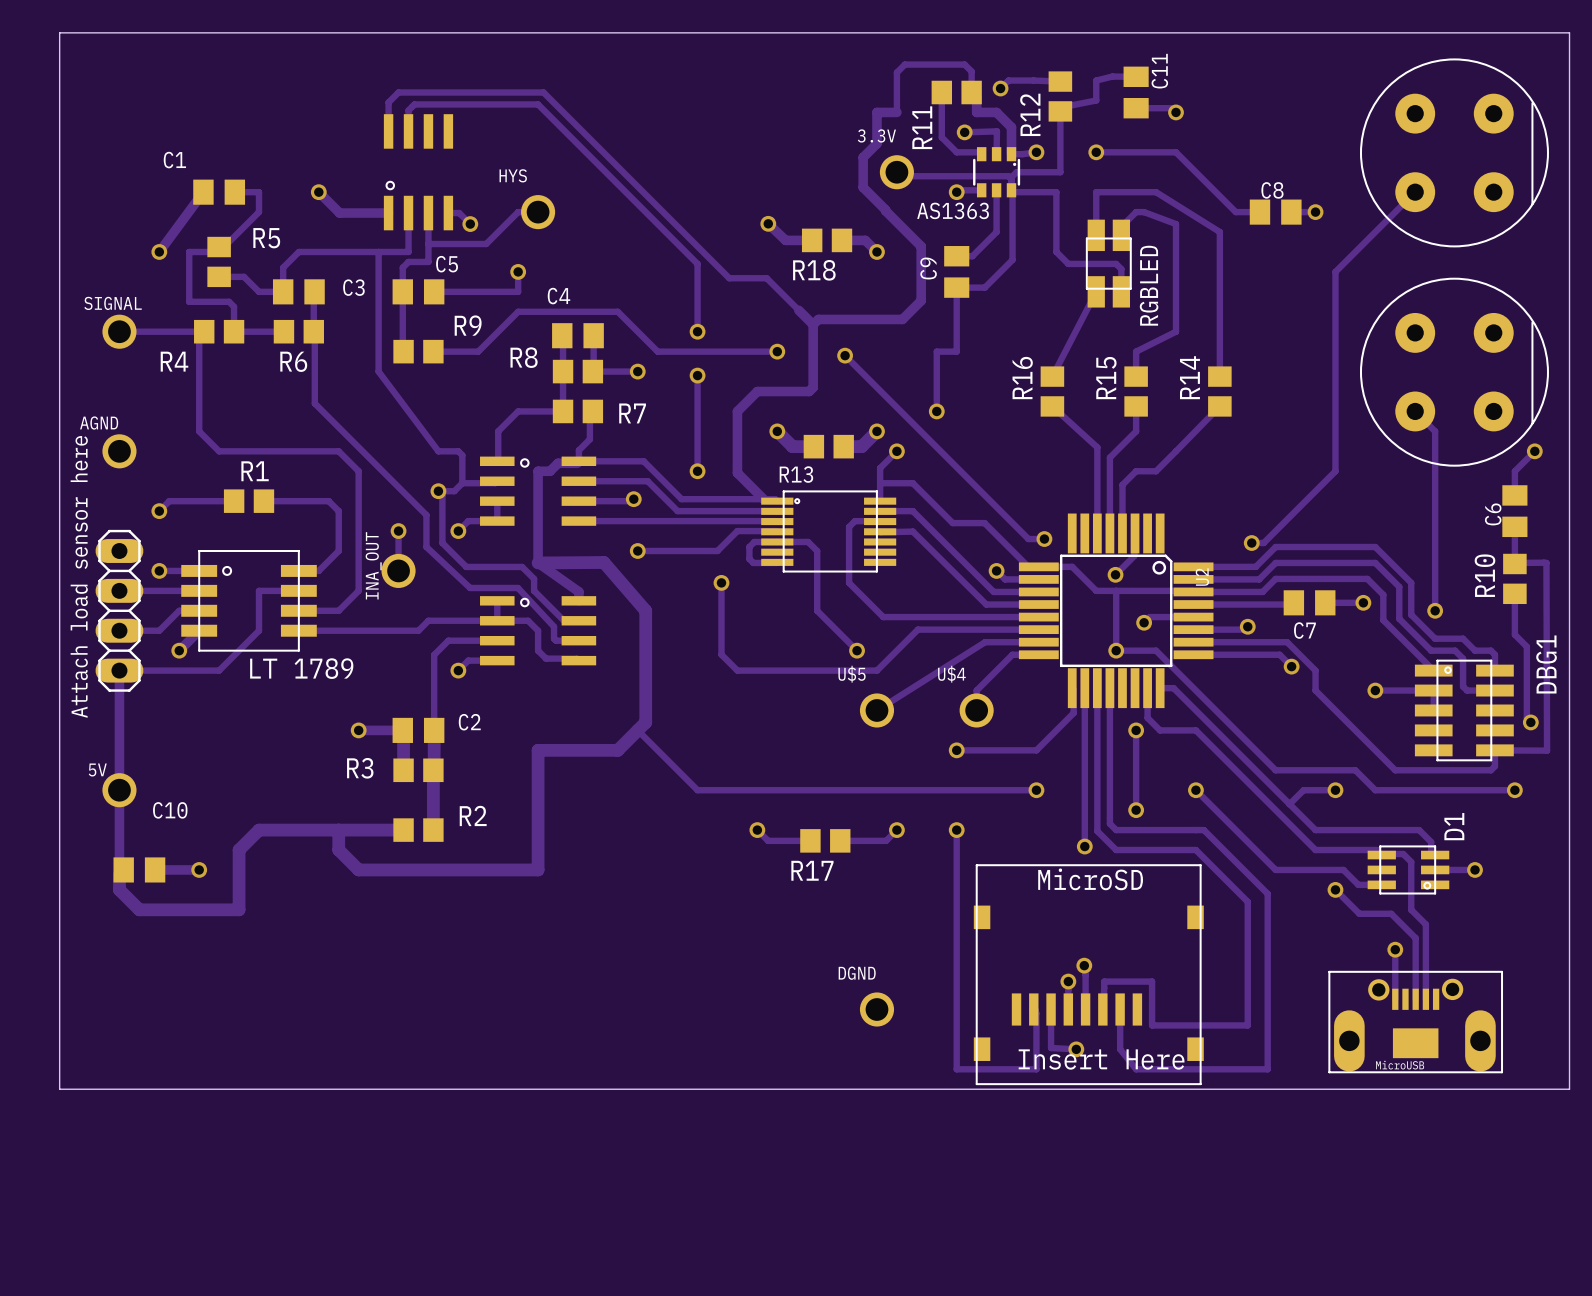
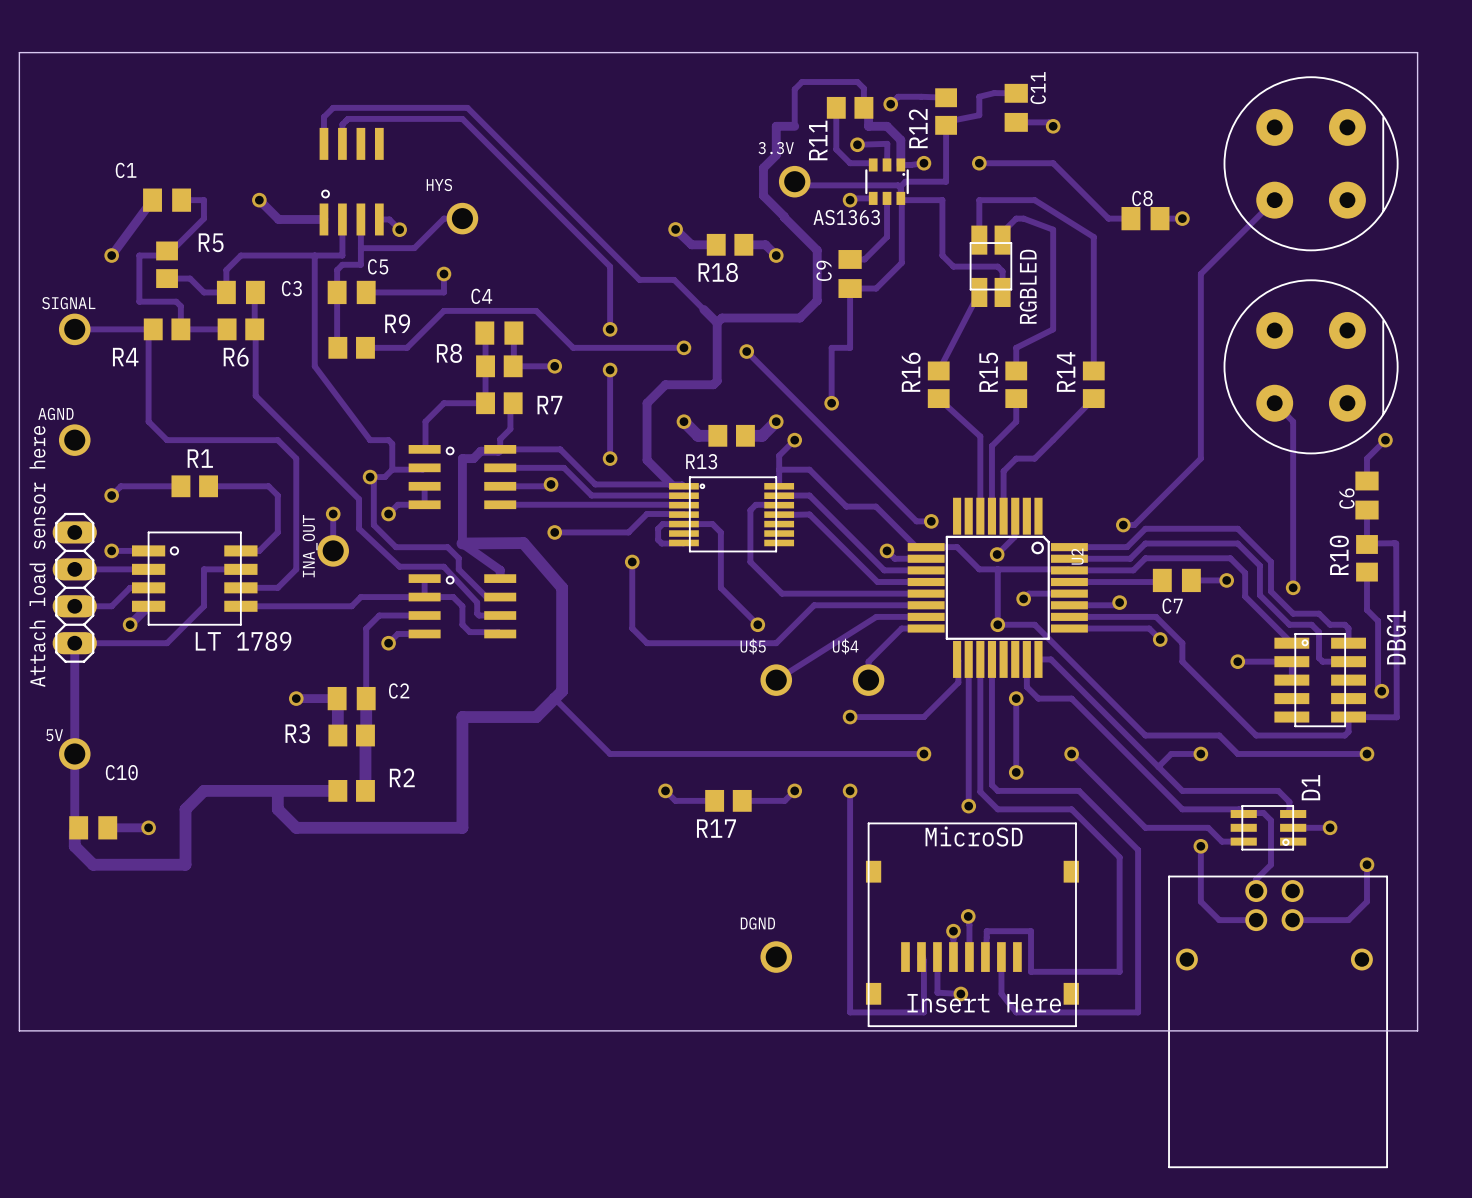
track: (1335, 889) (1359, 913) (1391, 913) (1415, 938) (1415, 999) -> (1200, 846) (1200, 901) (1219, 920) (1256, 920)
track: (1411, 909) (1425, 924) (1425, 999) -> (1271, 864) (1256, 879) (1256, 891)
track: none -> (1367, 864) (1367, 901) (1348, 920) (1292, 920)
via: none -> (1367, 864)
track: (1395, 949) (1395, 999) -> none
via: (1395, 949) -> none
part: (1415, 1022) -> none
part: none -> (1278, 1021)

